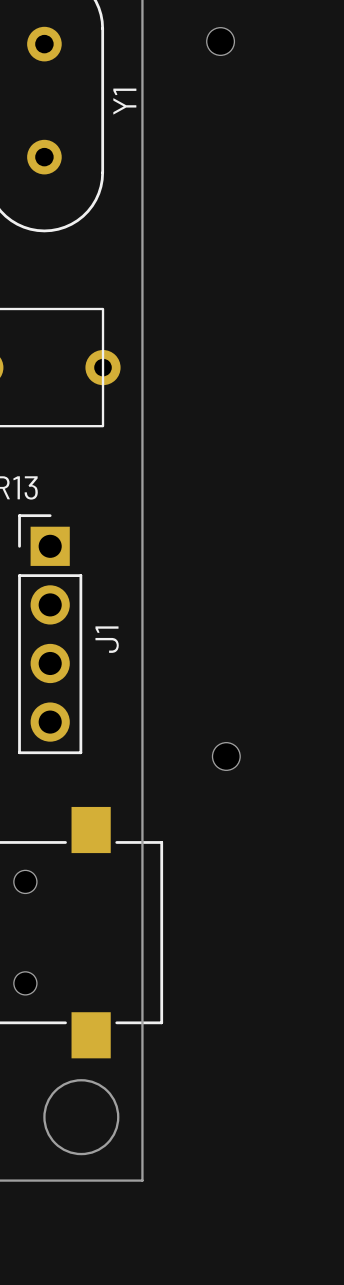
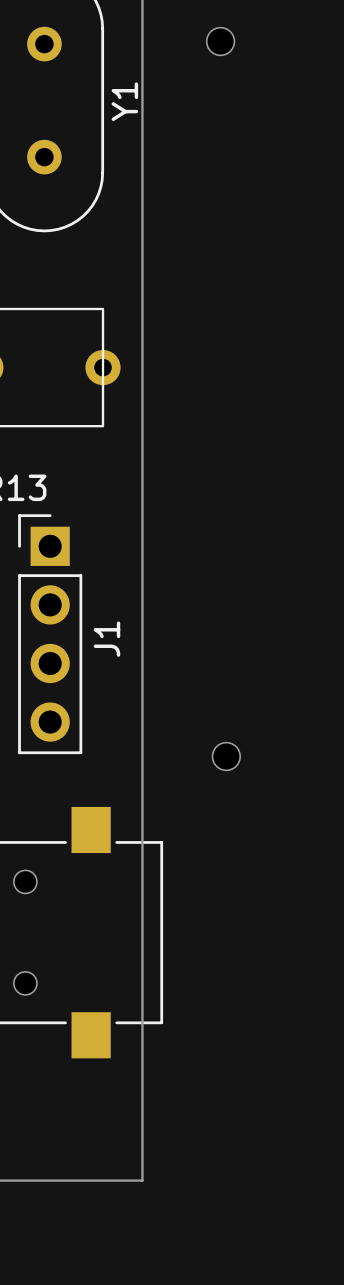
round board edge: [43, 1079, 120, 1156] -> none

